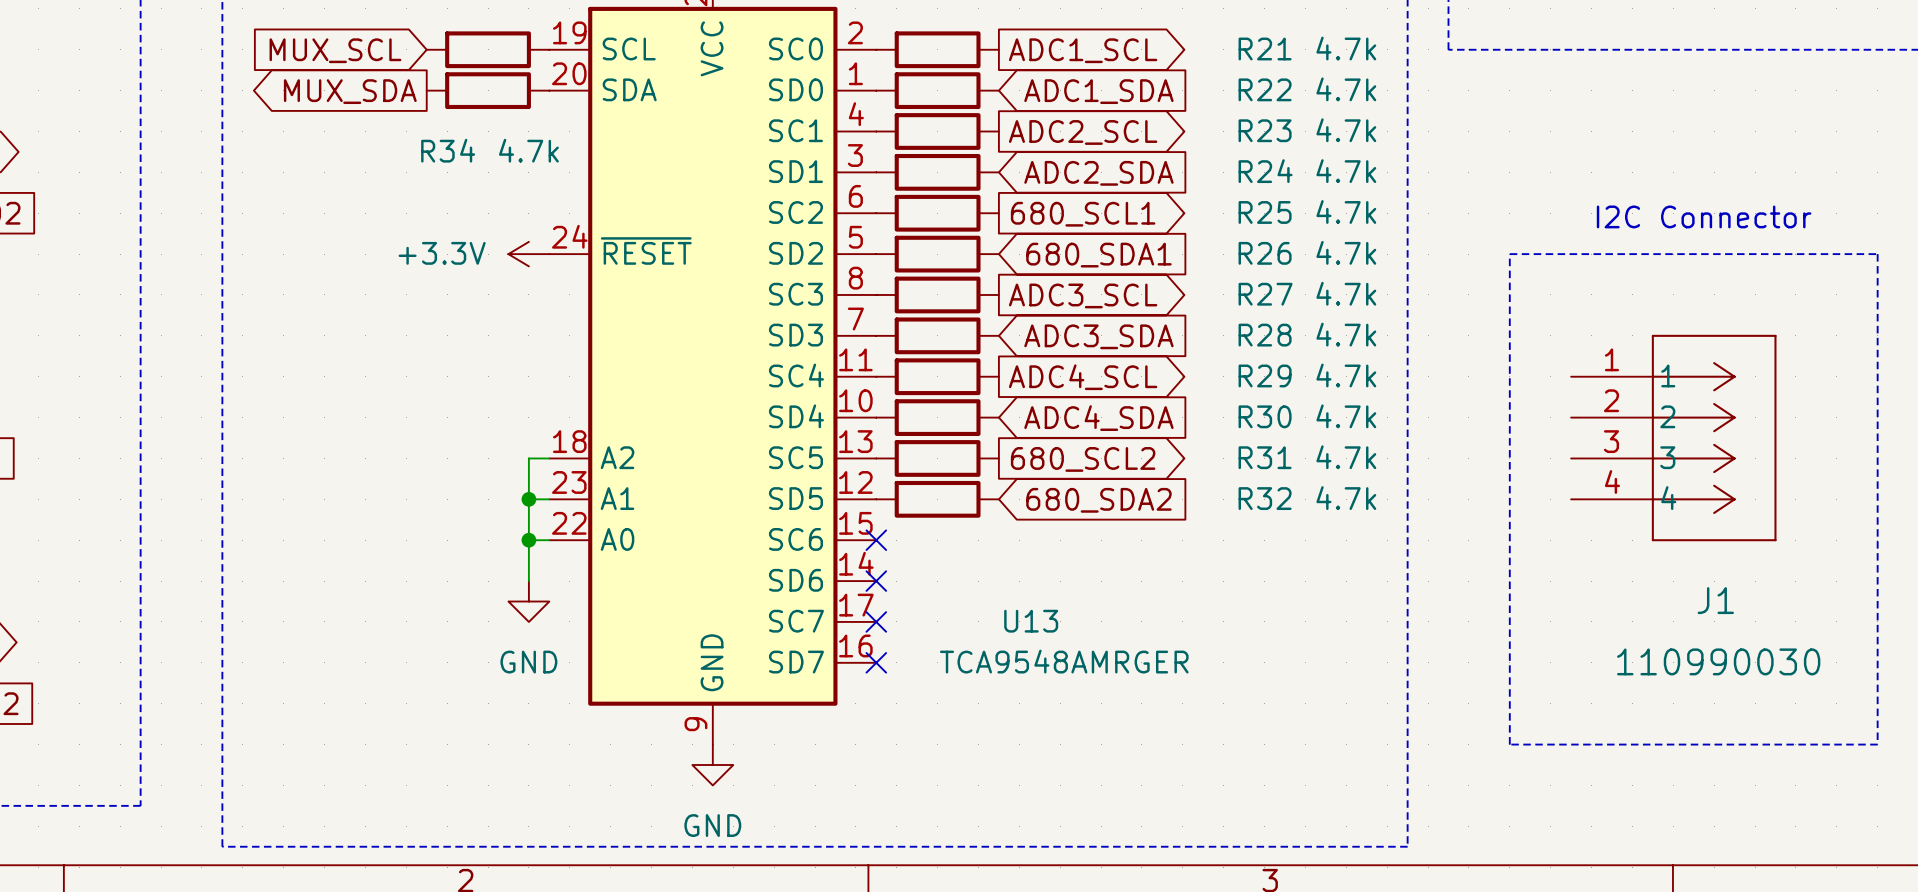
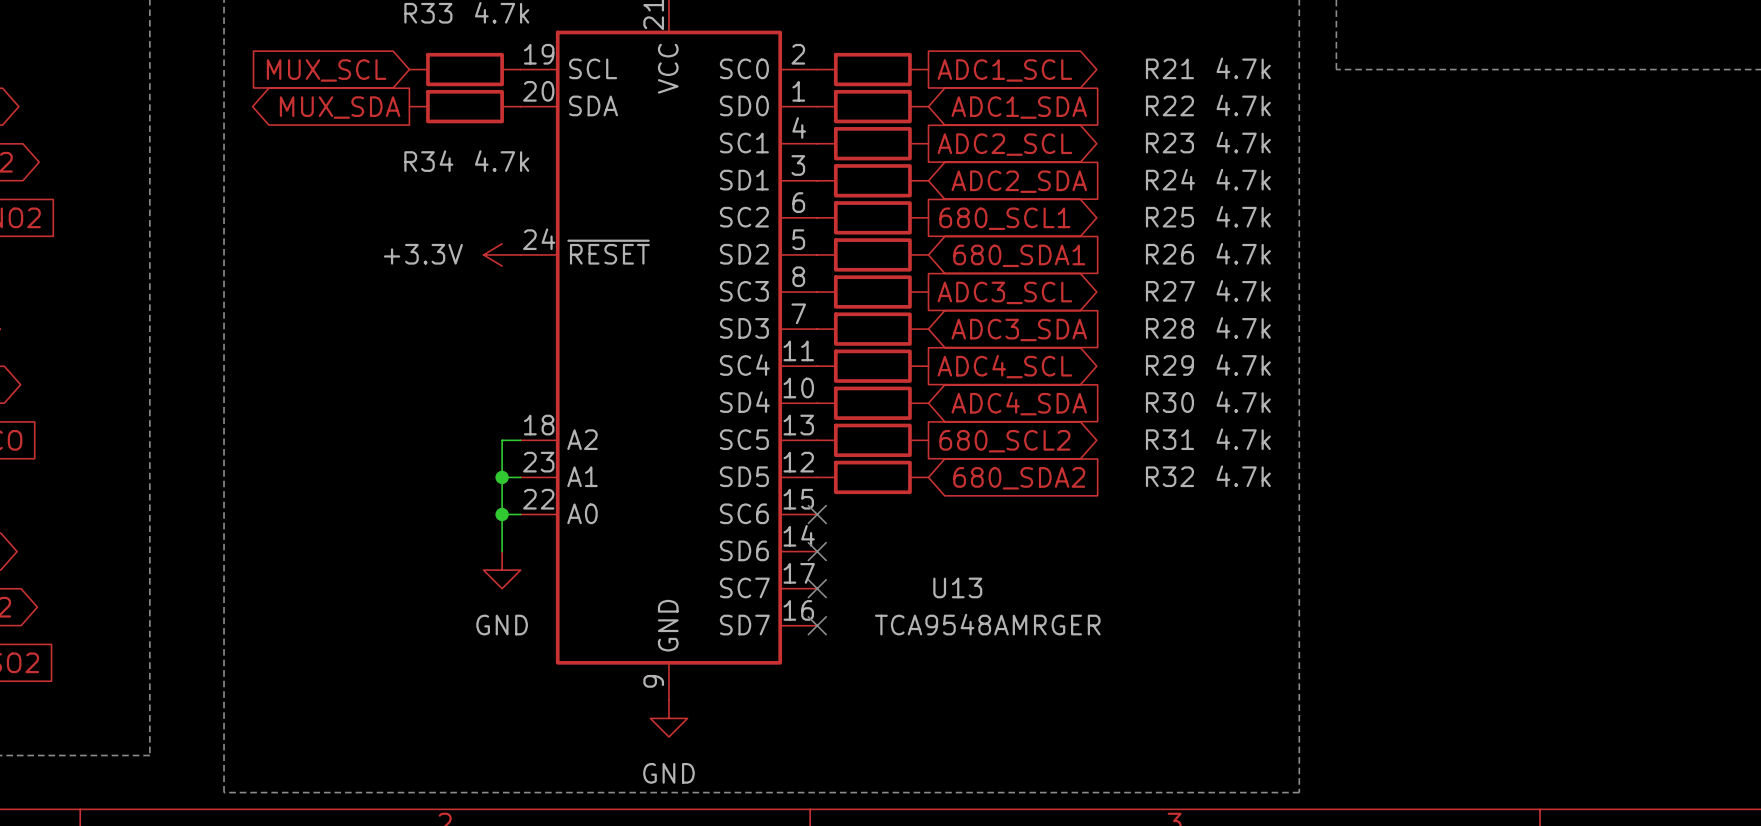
text: I2C Connector (1704, 216) -> none
line: (1509, 254) (1877, 254) (1877, 744) (1509, 744) (1509, 254) -> none
J1: 110990030 (1673, 438) -> none

